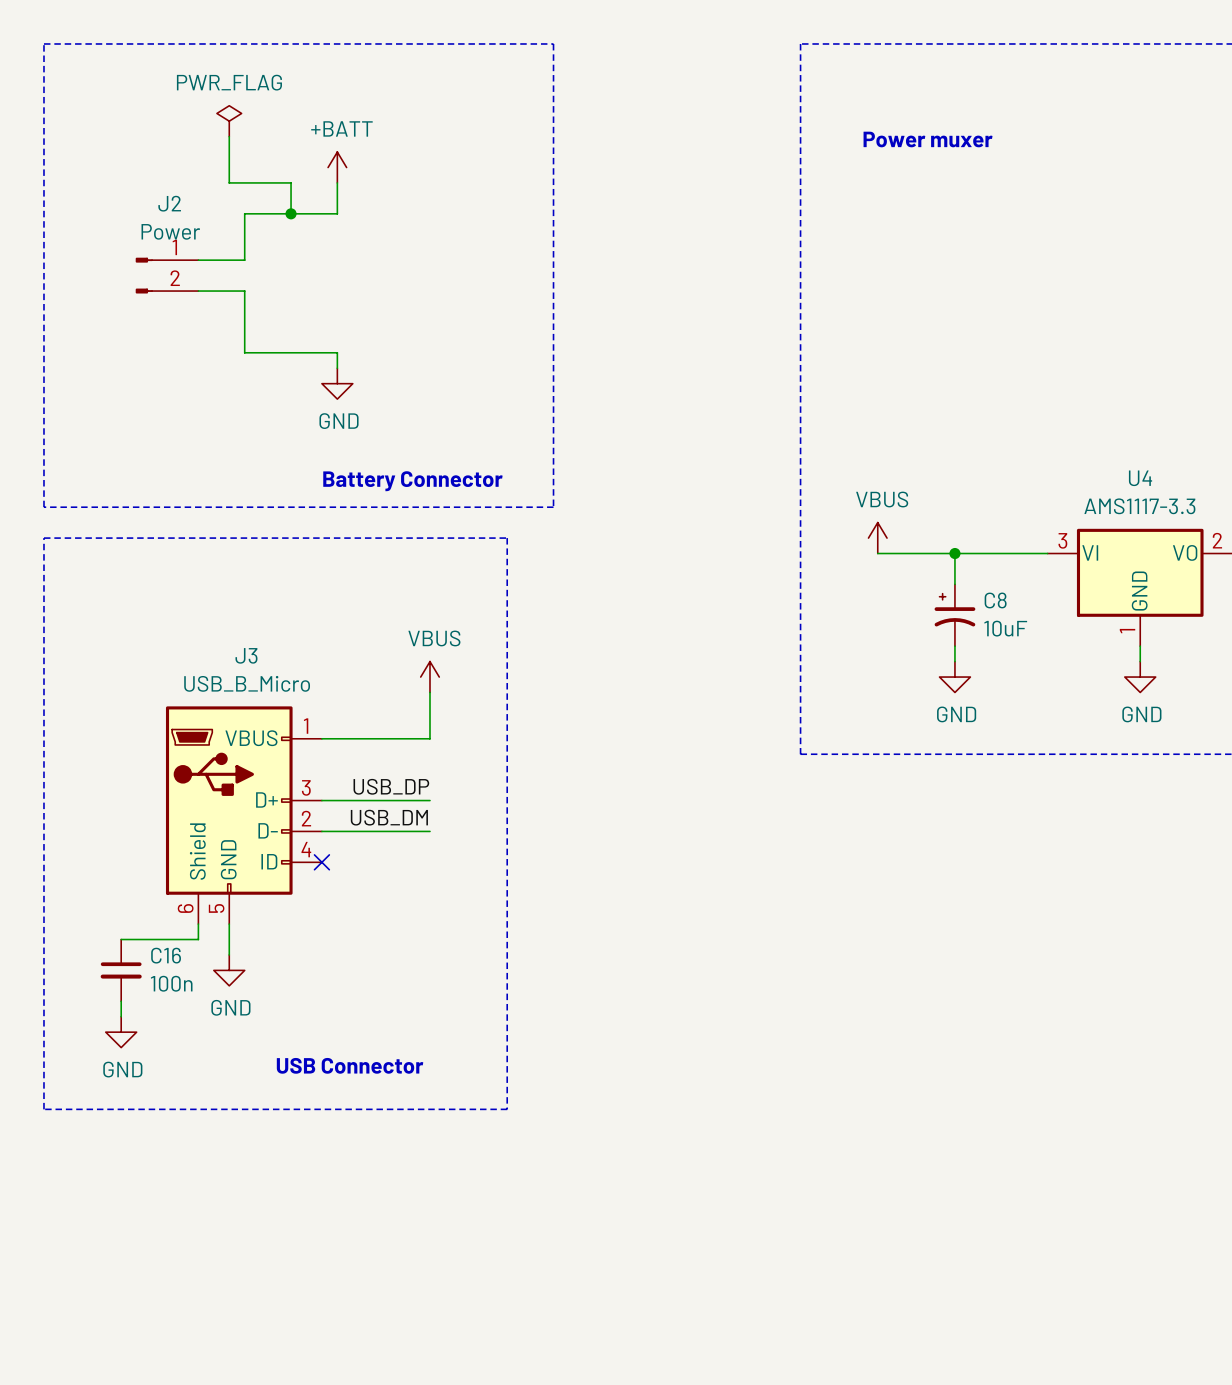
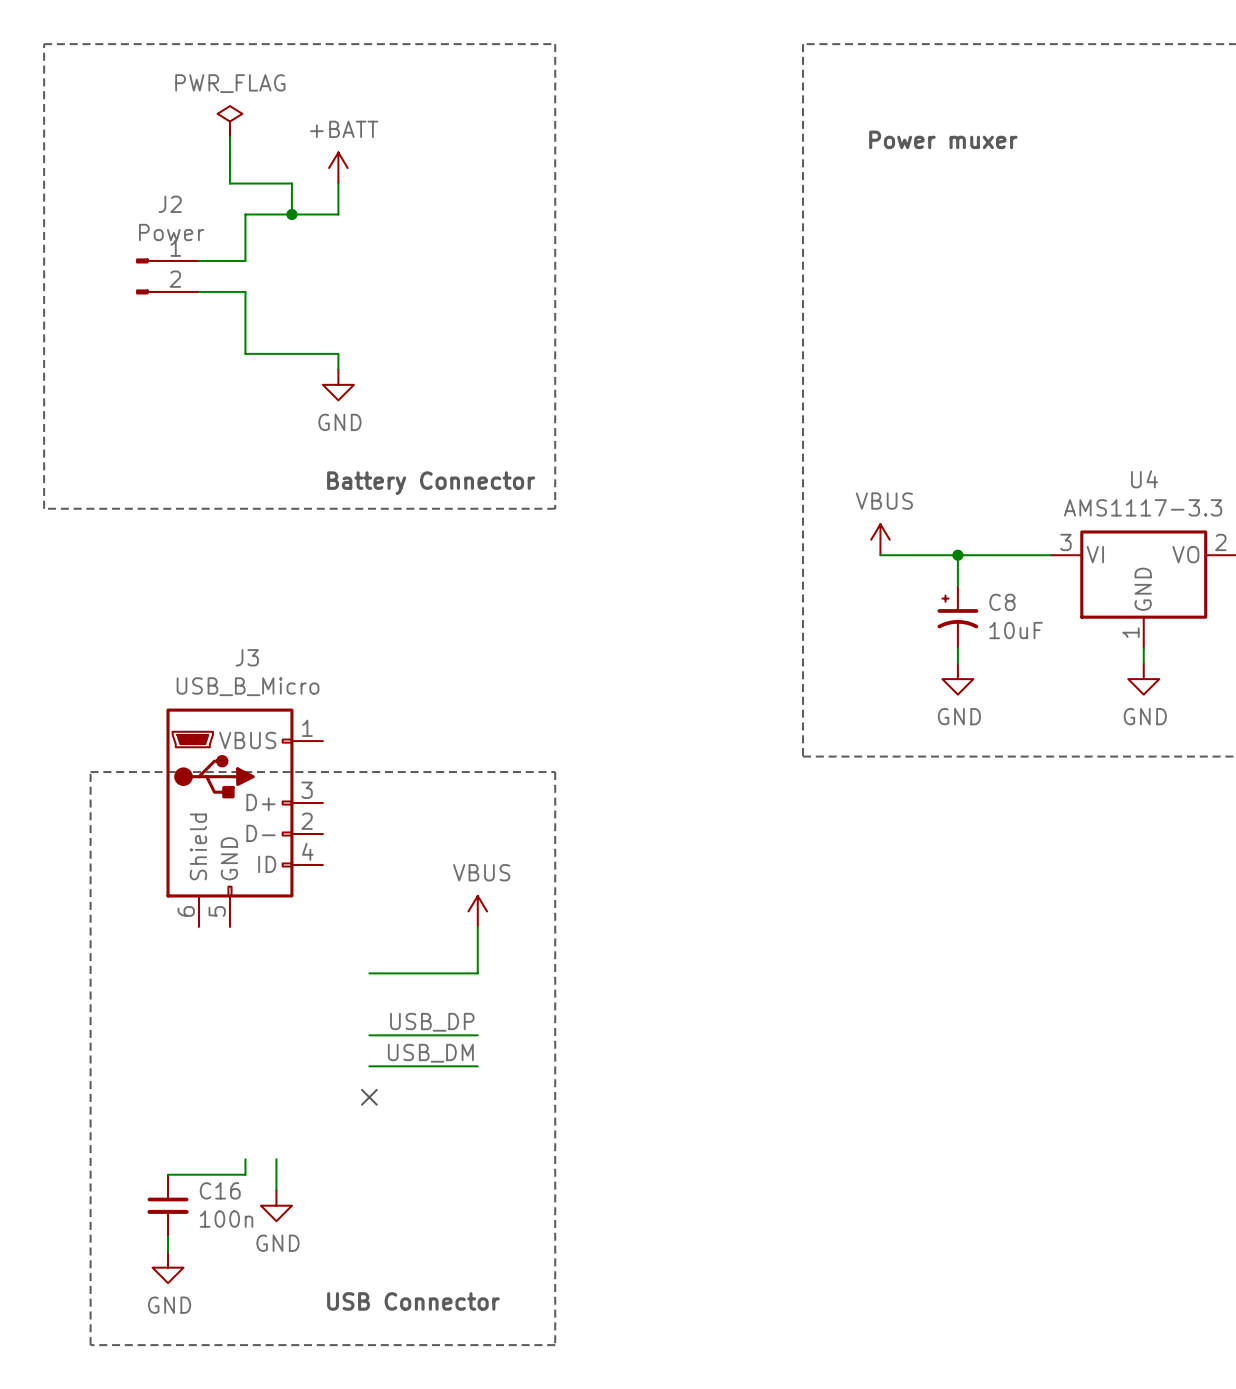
line: (43, 538) (507, 538) (507, 1109) (43, 1109) (43, 538) -> (90, 772) (555, 772) (555, 1345) (90, 1345) (90, 772)
power symbol position: VBUS (429, 677) -> VBUS (477, 911)
wire: (429, 692) (429, 738) (321, 738) -> (477, 926) (477, 973) (369, 973)
label position: USB_DP (391, 786) -> USB_DP (432, 1022)
wire: (321, 800) (429, 800) -> (369, 1035) (477, 1035)
label position: USB_DM (389, 817) -> USB_DM (430, 1053)
wire: (321, 831) (429, 831) -> (369, 1066) (477, 1066)
no-connect mark: (321, 862) -> none
wire: (198, 924) (198, 939) (121, 939) -> (245, 1159) (245, 1174) (168, 1174)
wire: (229, 924) (229, 954) -> (276, 1159) (276, 1190)
C16 position: (121, 970) -> (168, 1205)
power symbol: GND (229, 970) -> none
wire: (121, 1001) (121, 1016) -> (168, 1236) (168, 1252)
power symbol: GND (121, 1032) -> none
text position: USB Connector (350, 1065) -> USB Connector (413, 1301)
no-connect mark: none -> (369, 1097)
power symbol: none -> GND (276, 1205)
power symbol: none -> GND (168, 1267)

